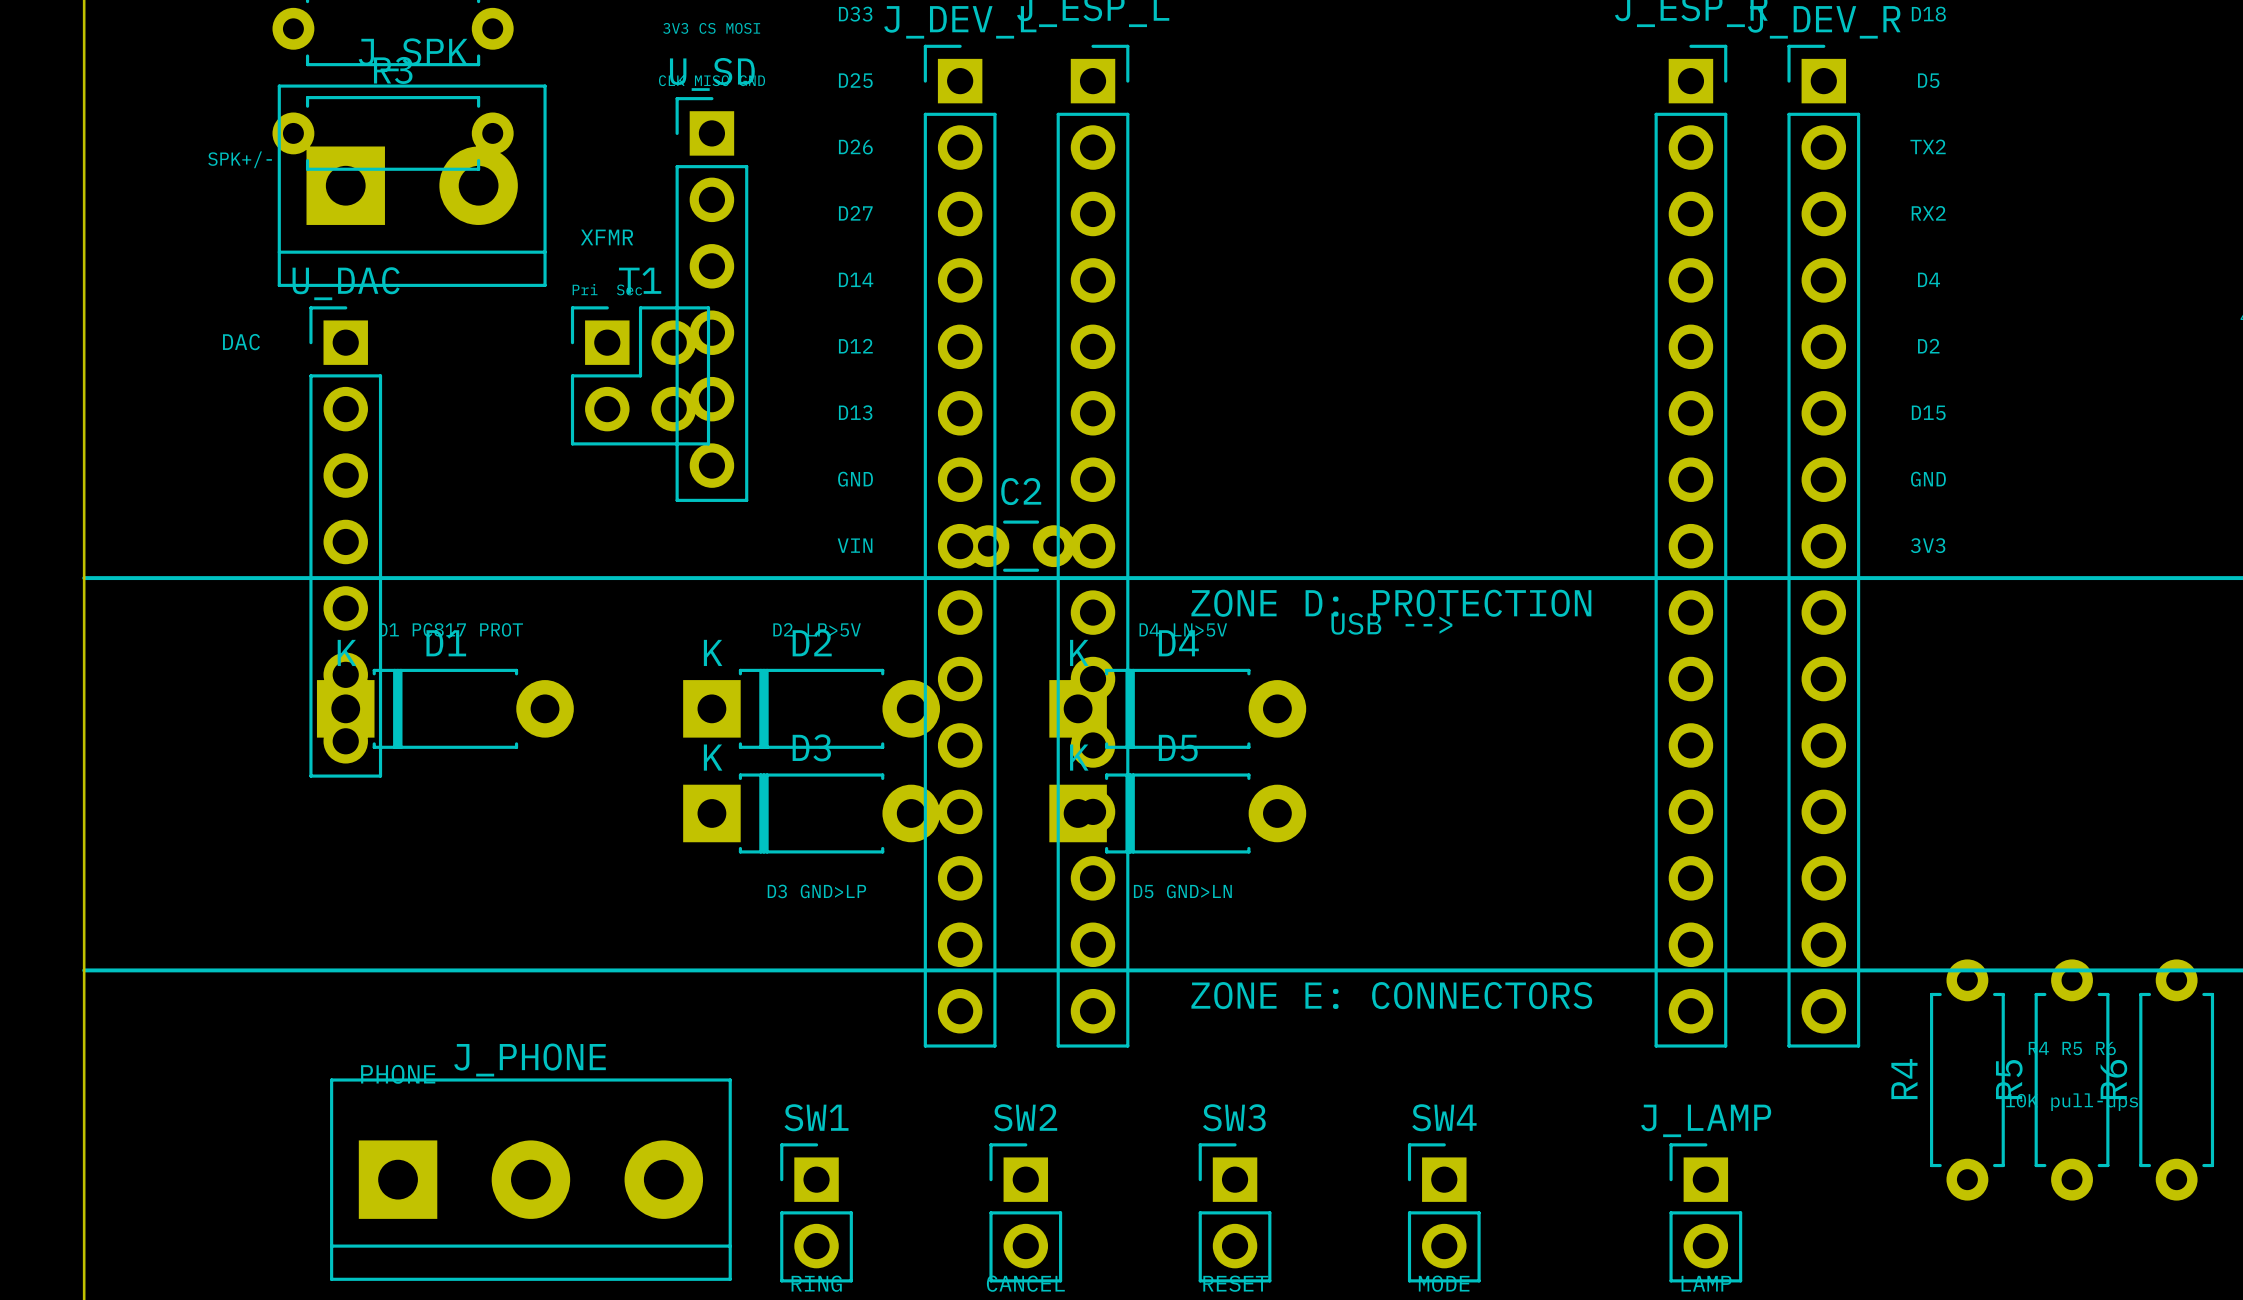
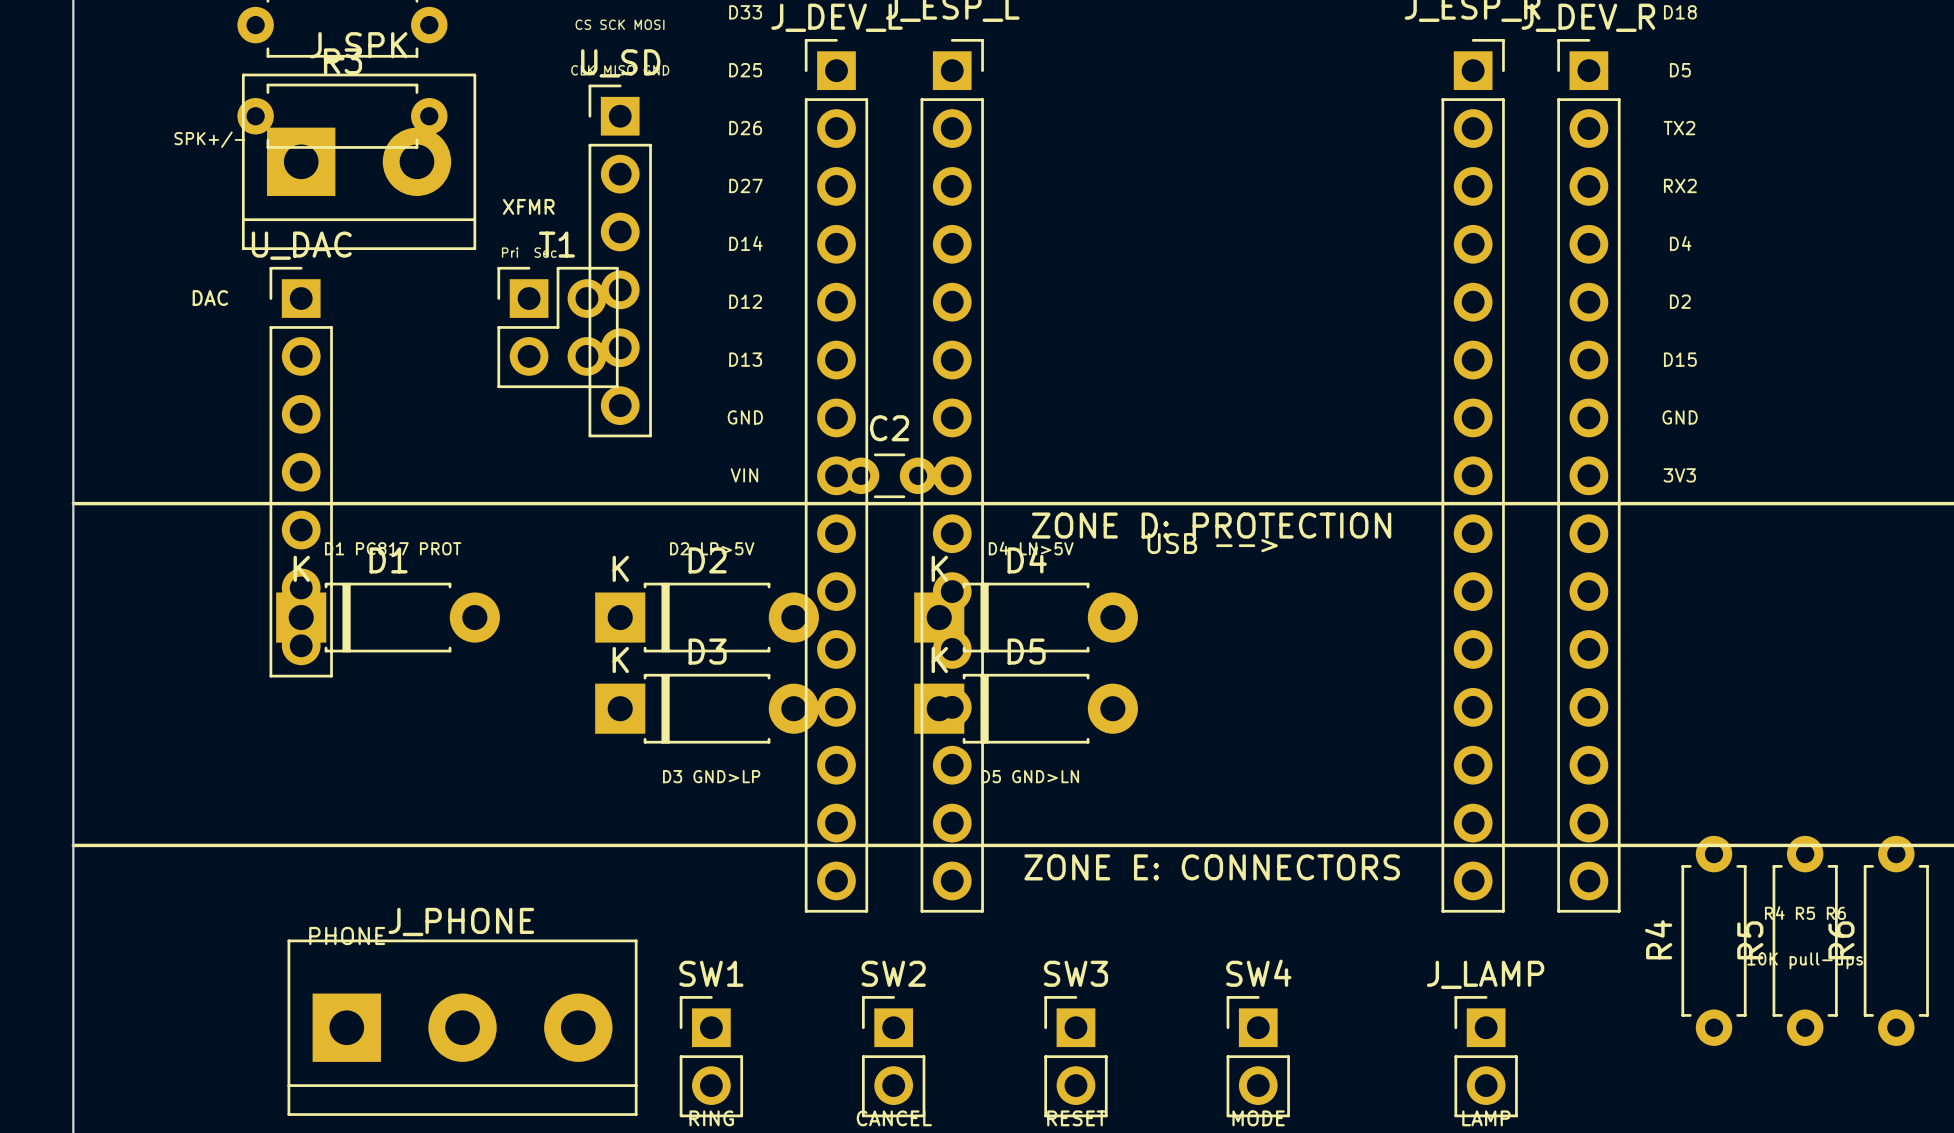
text: 3V3 CS MOSI (711, 28) -> CS SCK MOSI (620, 24)

